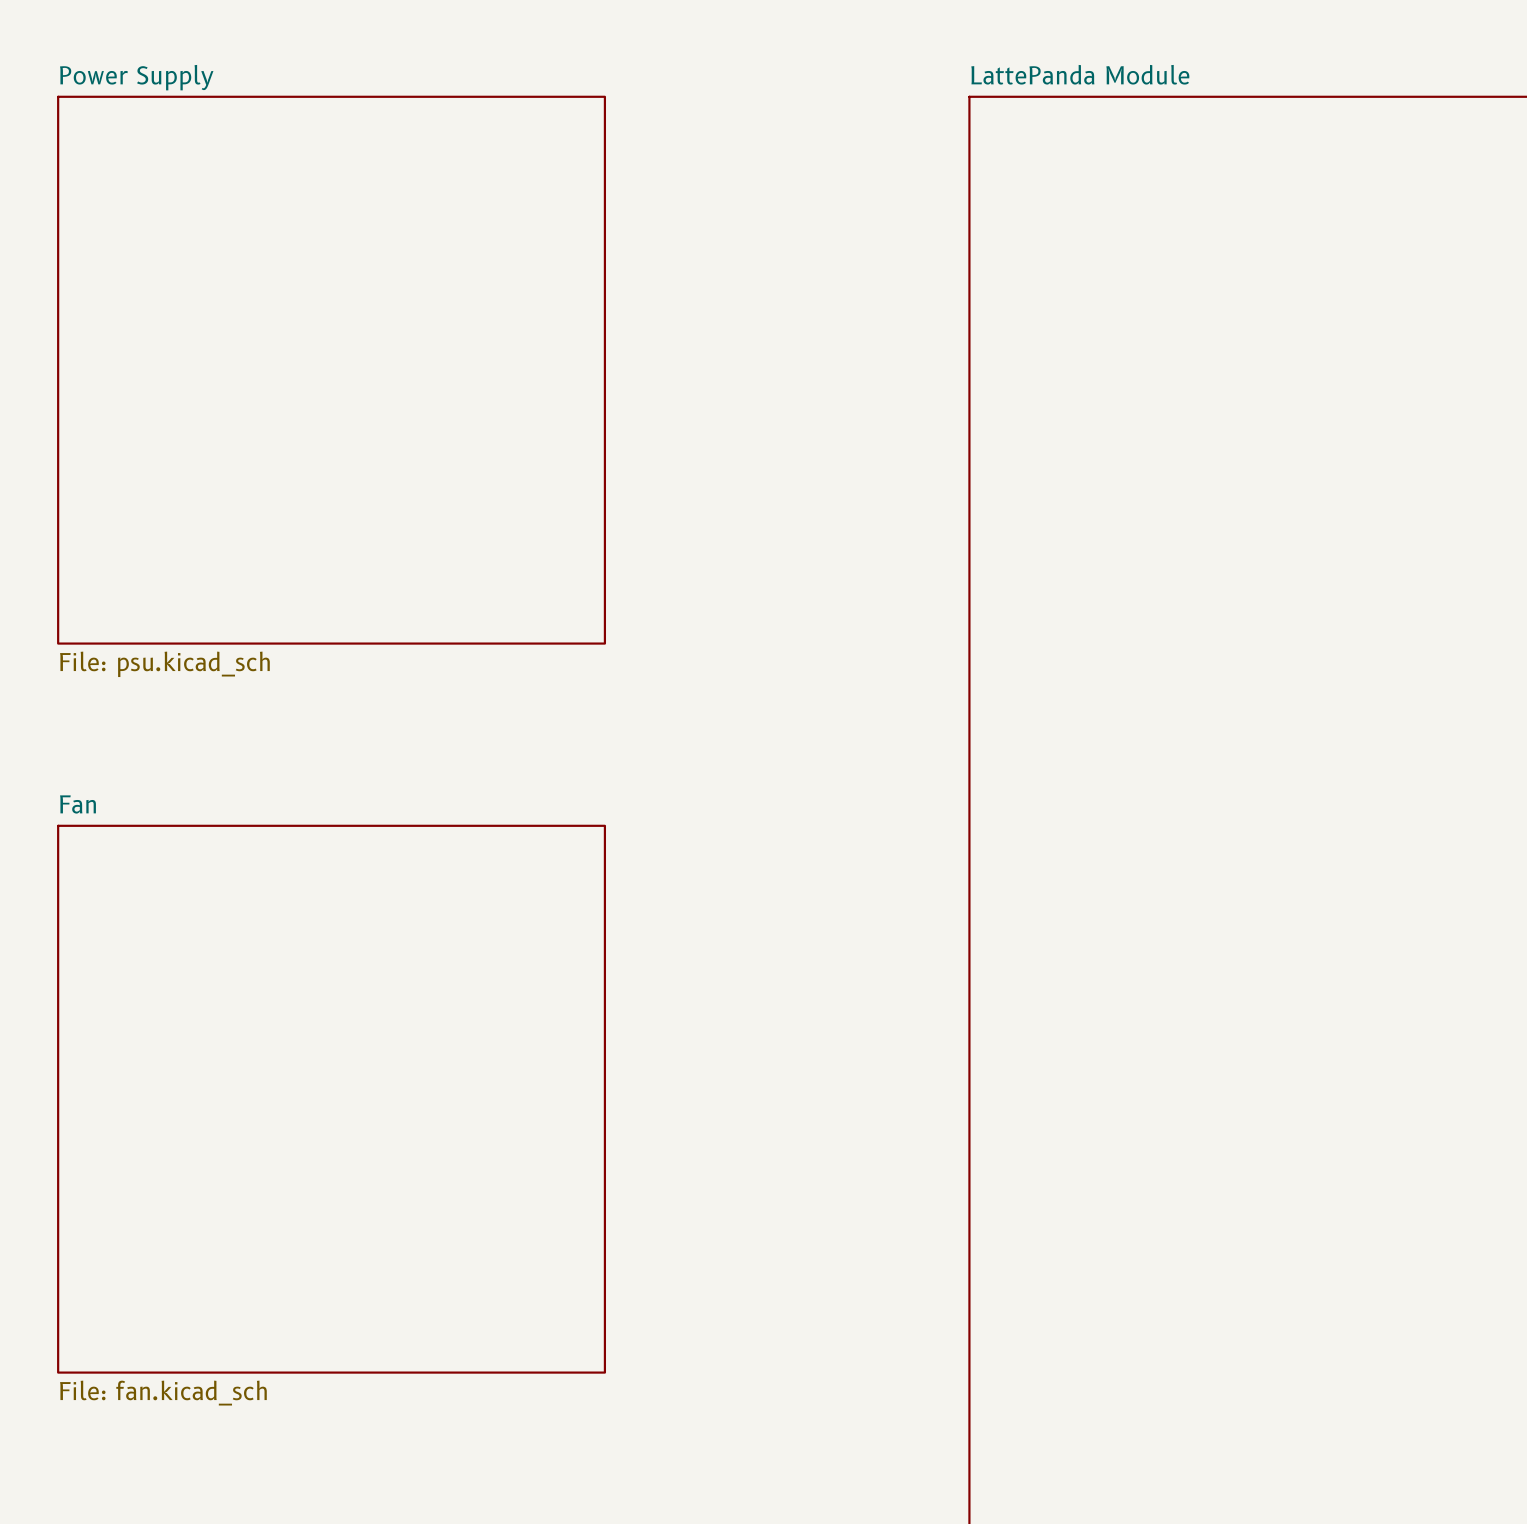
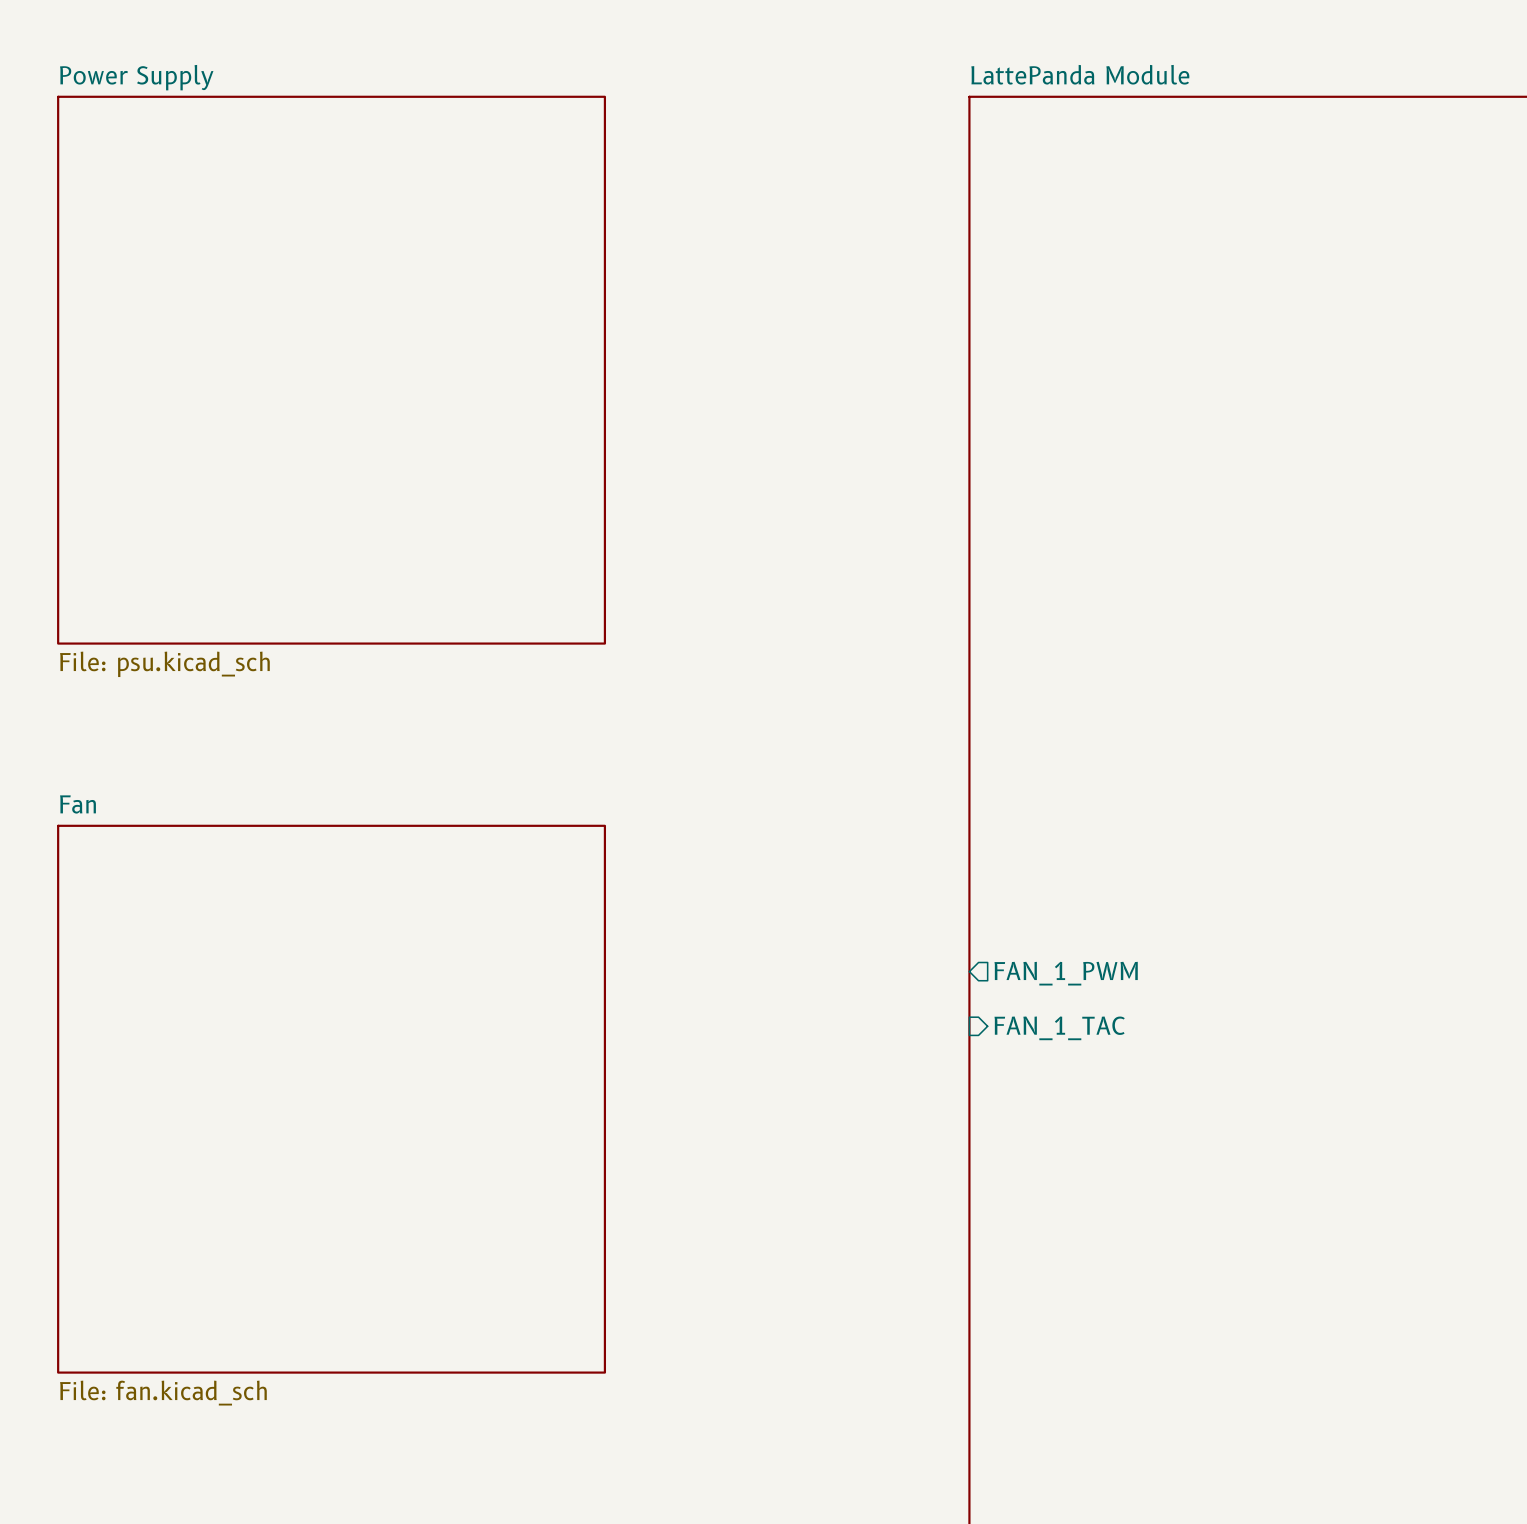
sheet pin: none -> FAN_1_PWM (1066, 973)
sheet pin: none -> FAN_1_TAC (1059, 1028)

